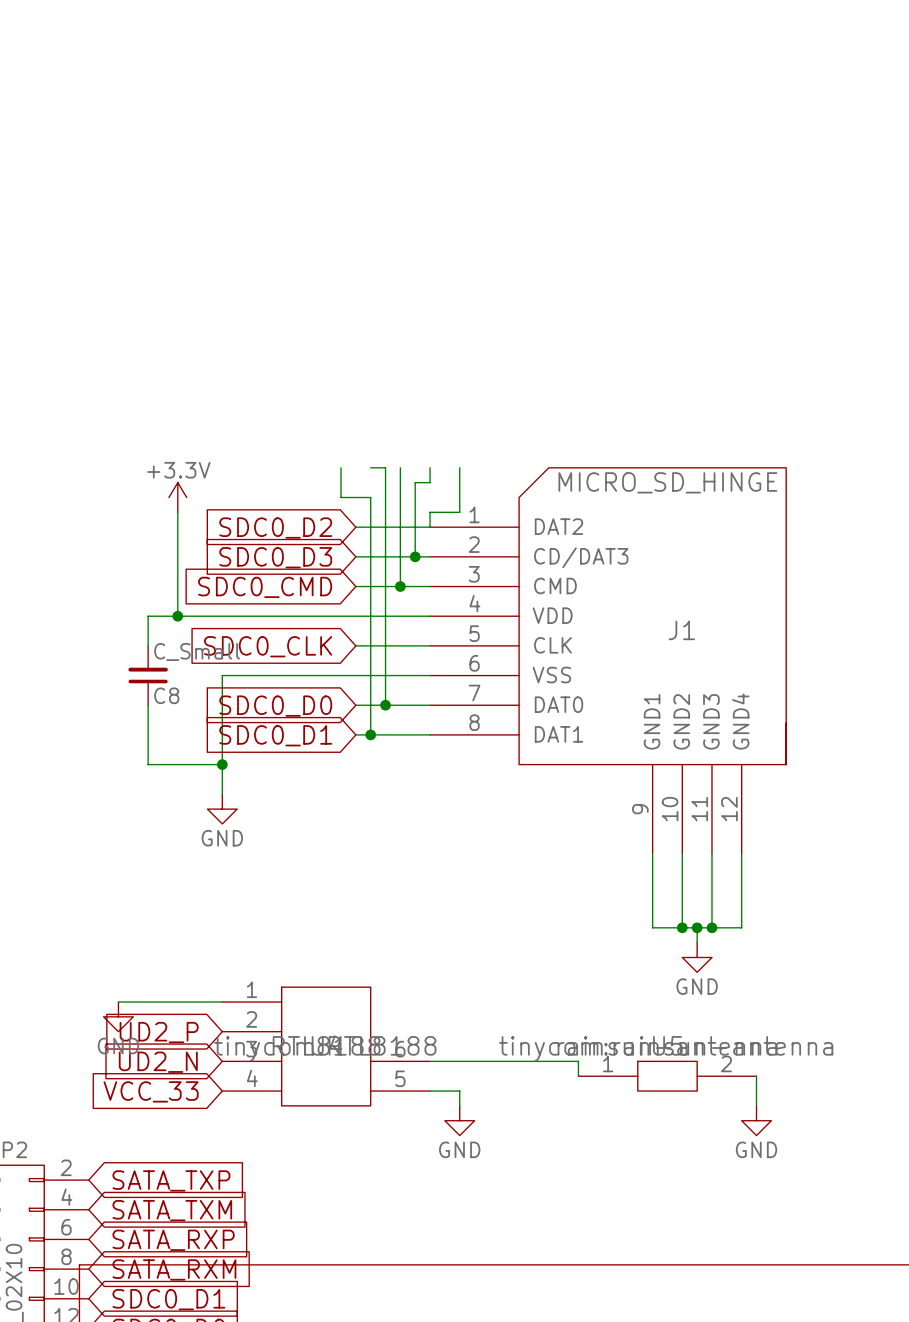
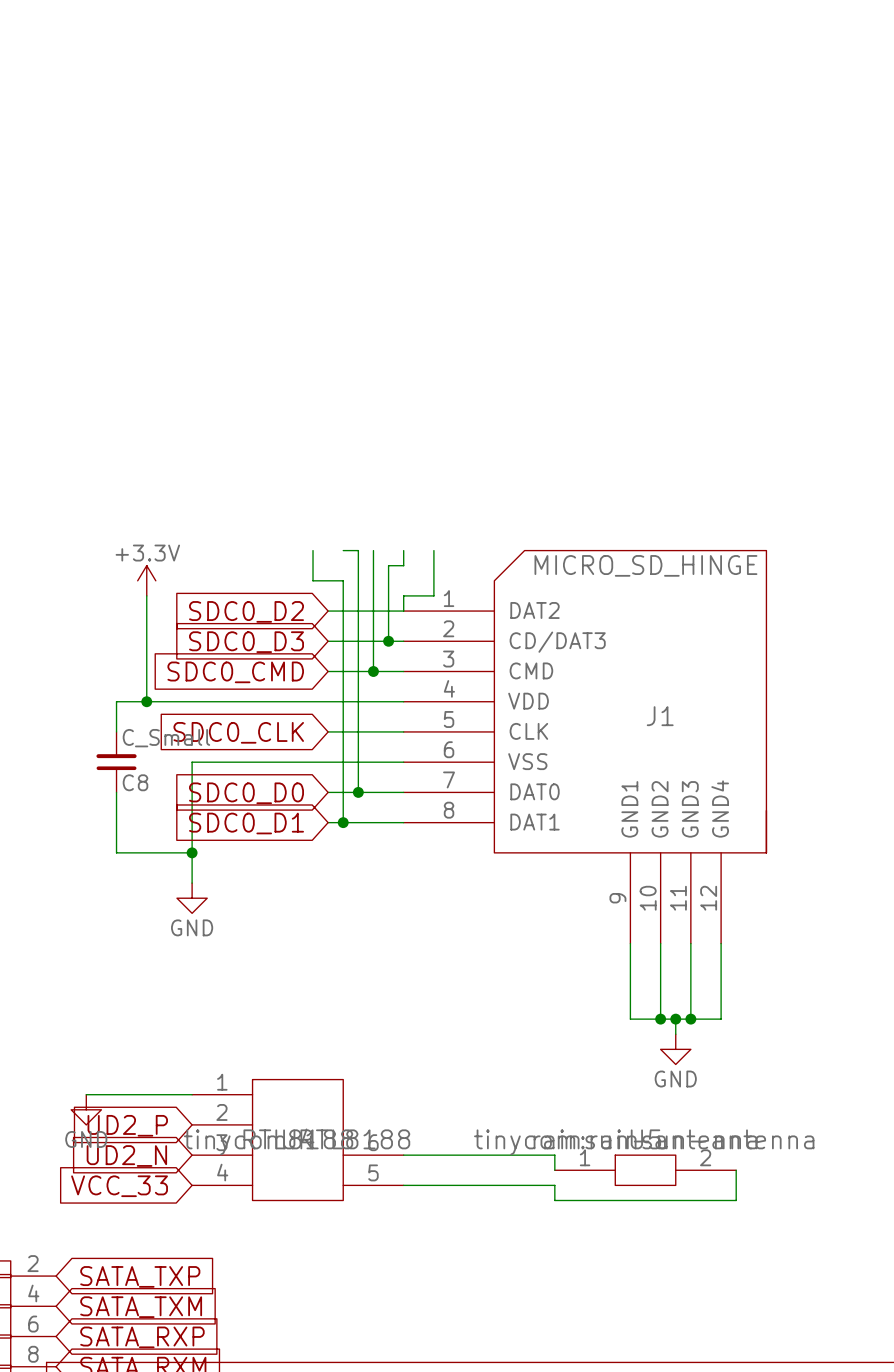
wire: (459, 1091) (459, 1105) -> (433, 1185) (554, 1185) (554, 1200) (736, 1200)
power symbol: GND (459, 1120) -> none
power symbol: GND (756, 1120) -> none

